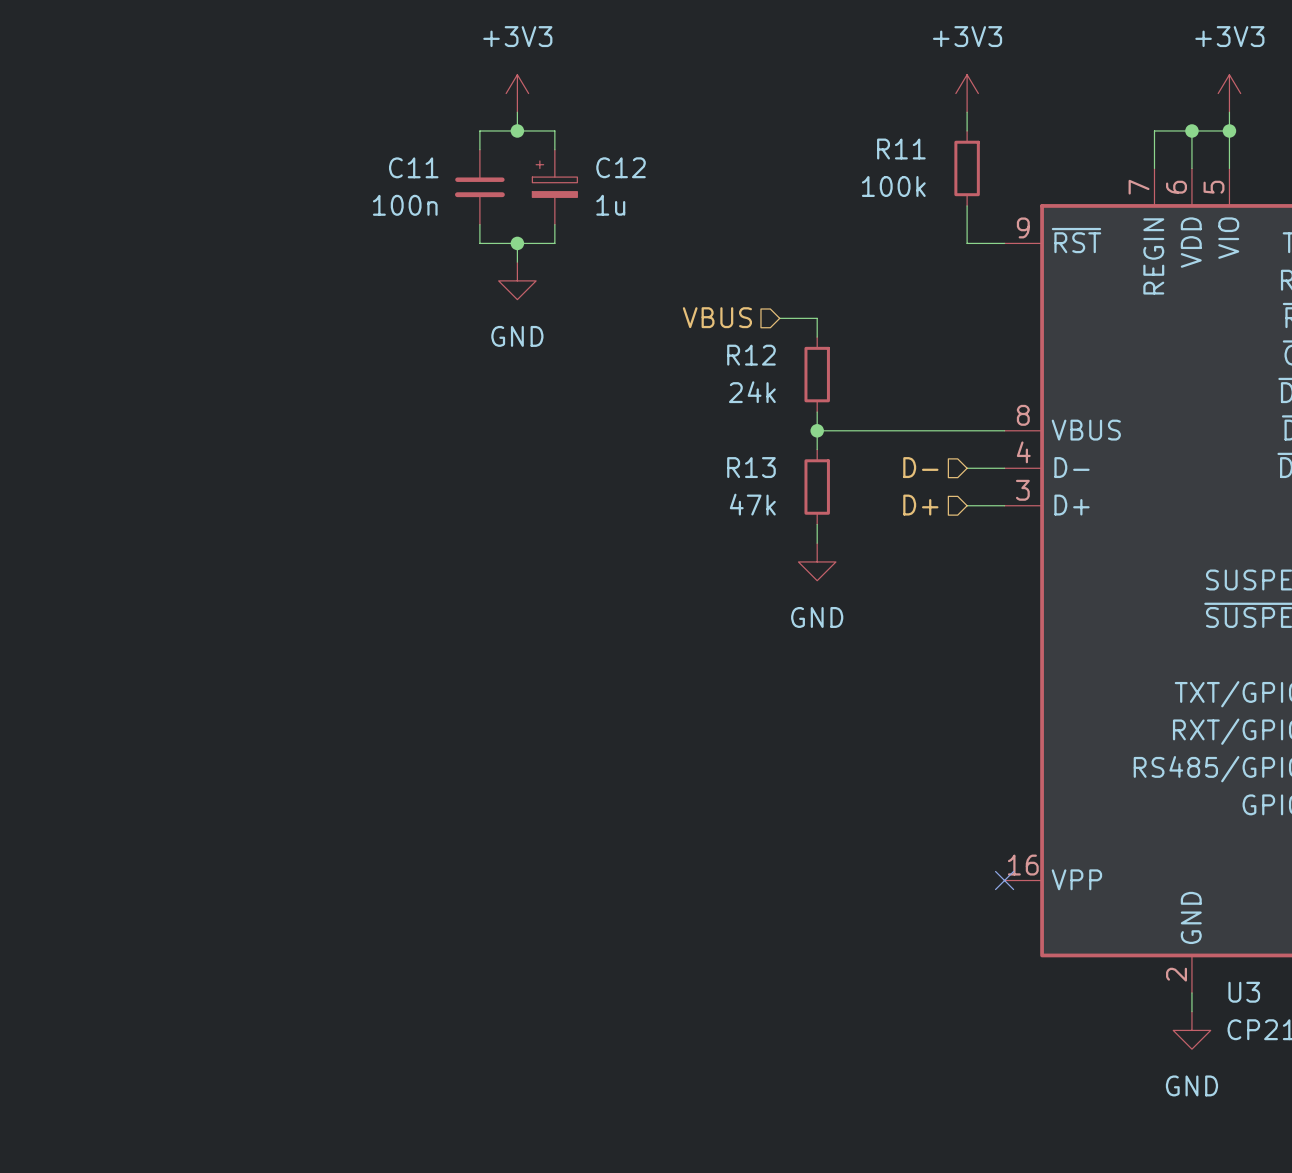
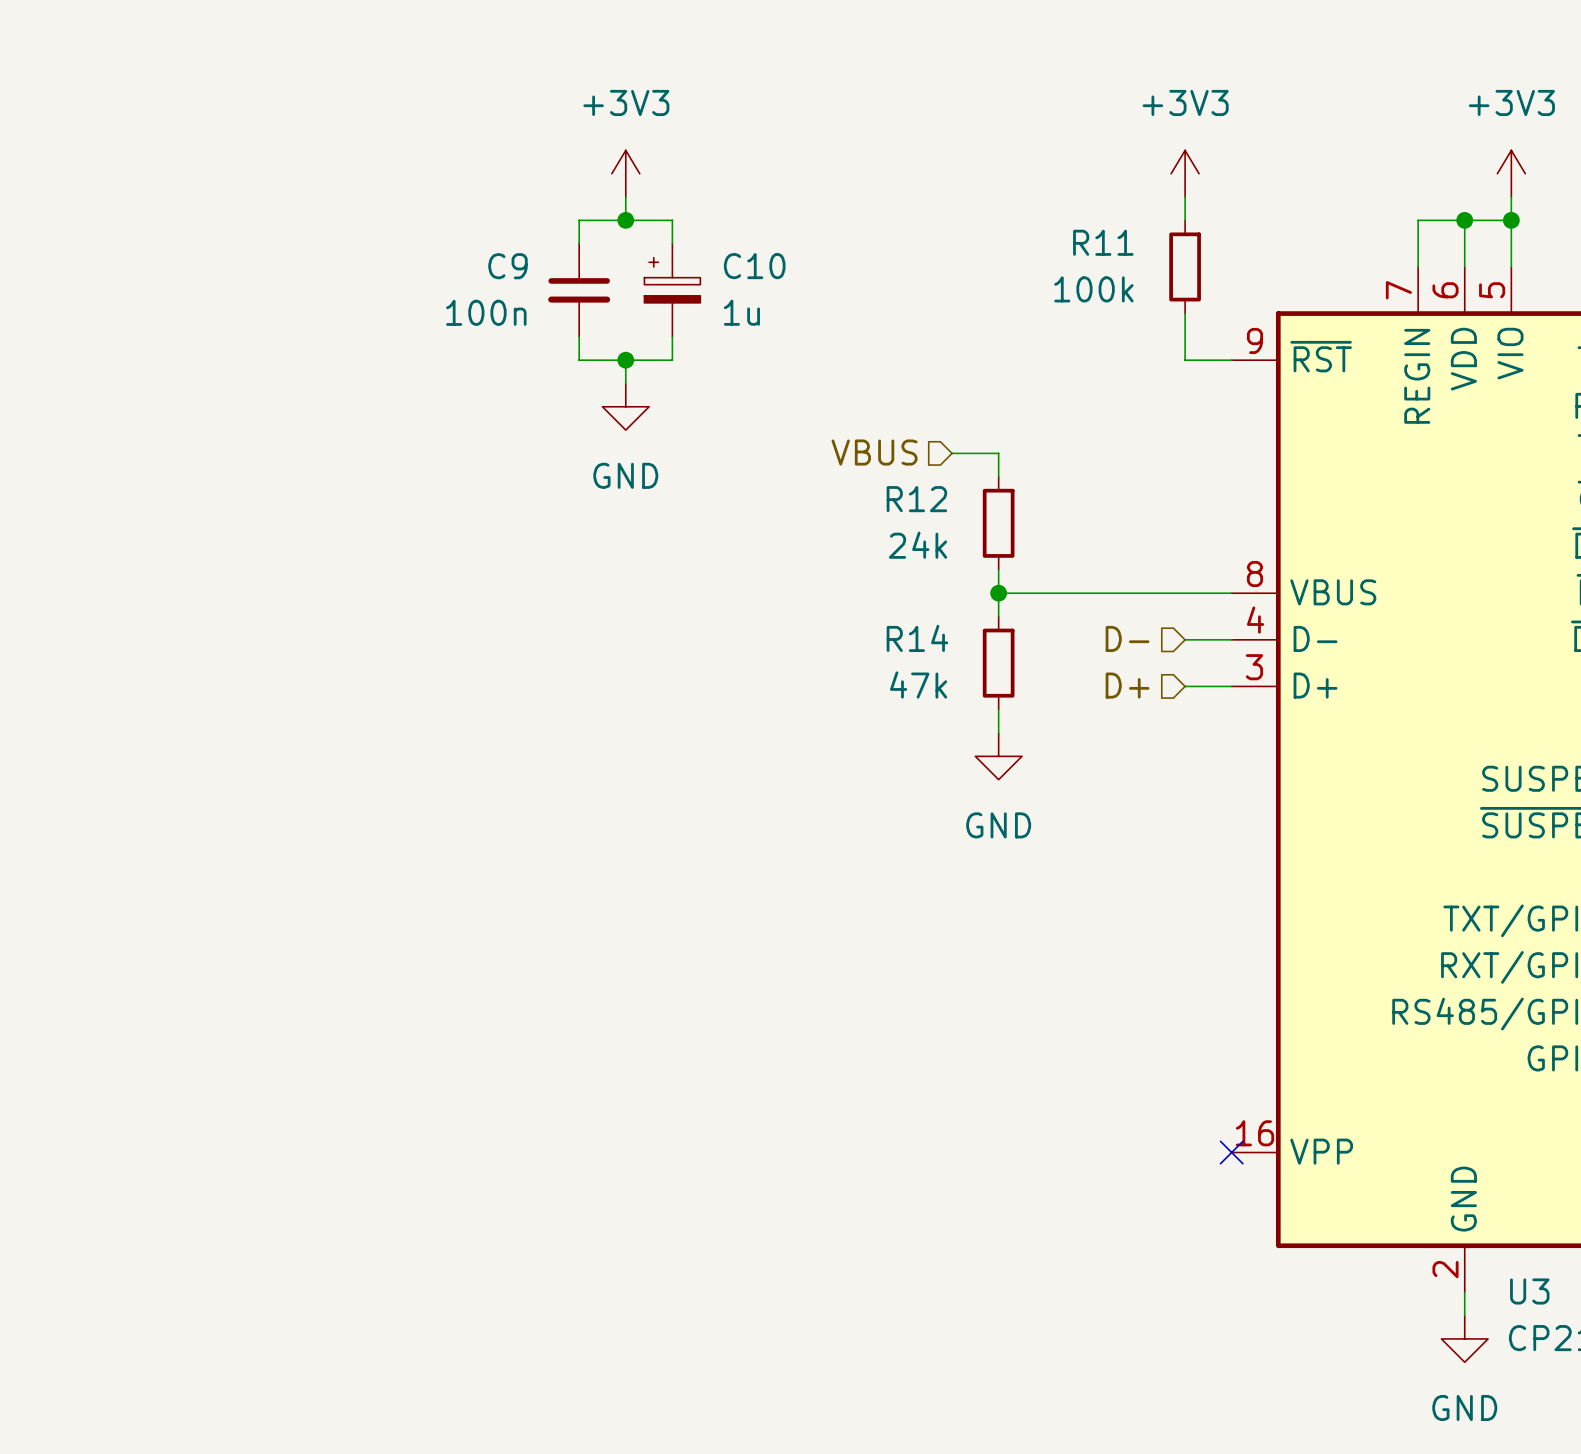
C11 name: C11 (413, 167) -> C9 (507, 266)
C12 name: C12 (621, 167) -> C10 (754, 266)
R13 name: R13 (751, 467) -> R14 (917, 638)

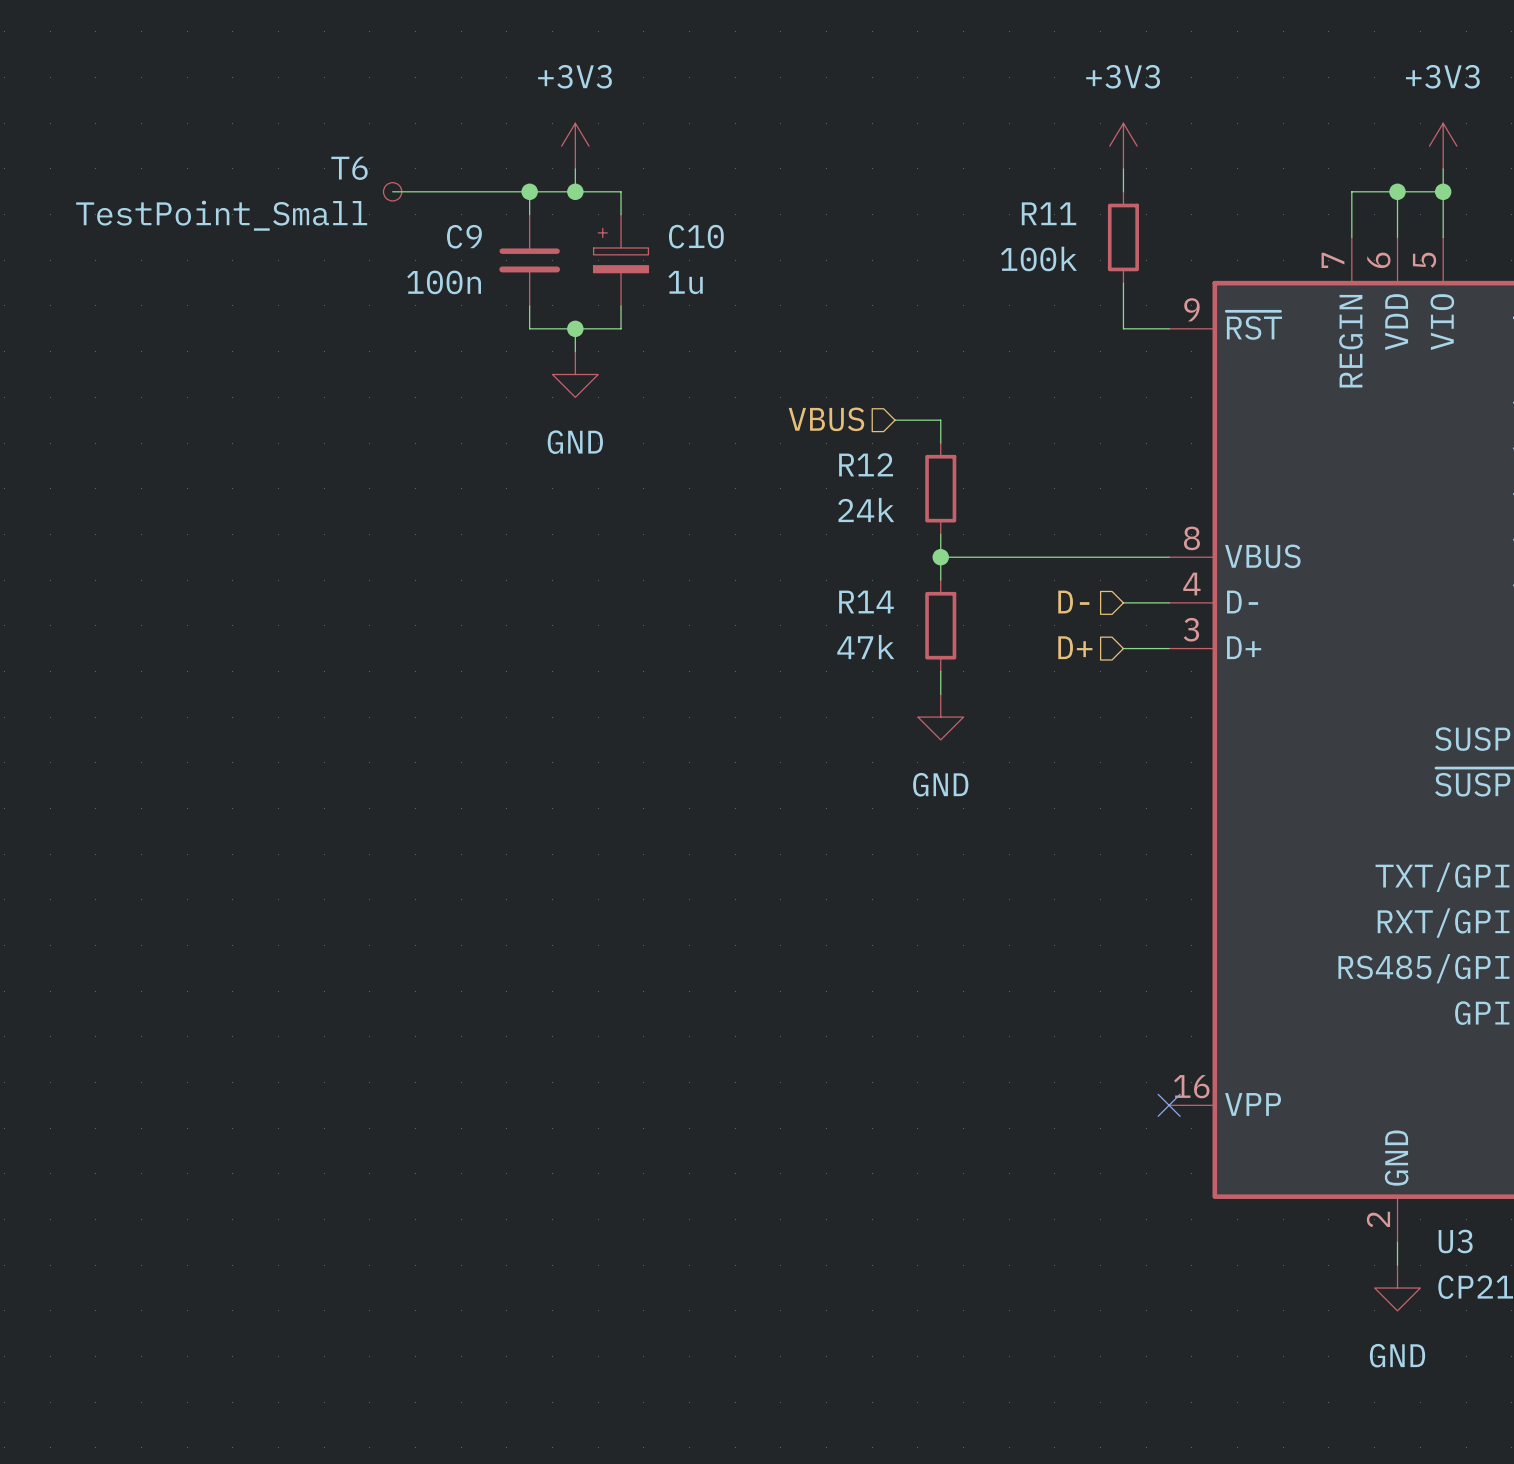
wire: none -> (392, 191) (529, 191)
T6: none -> TestPoint_Small (392, 191)
junction: none -> (529, 191)

